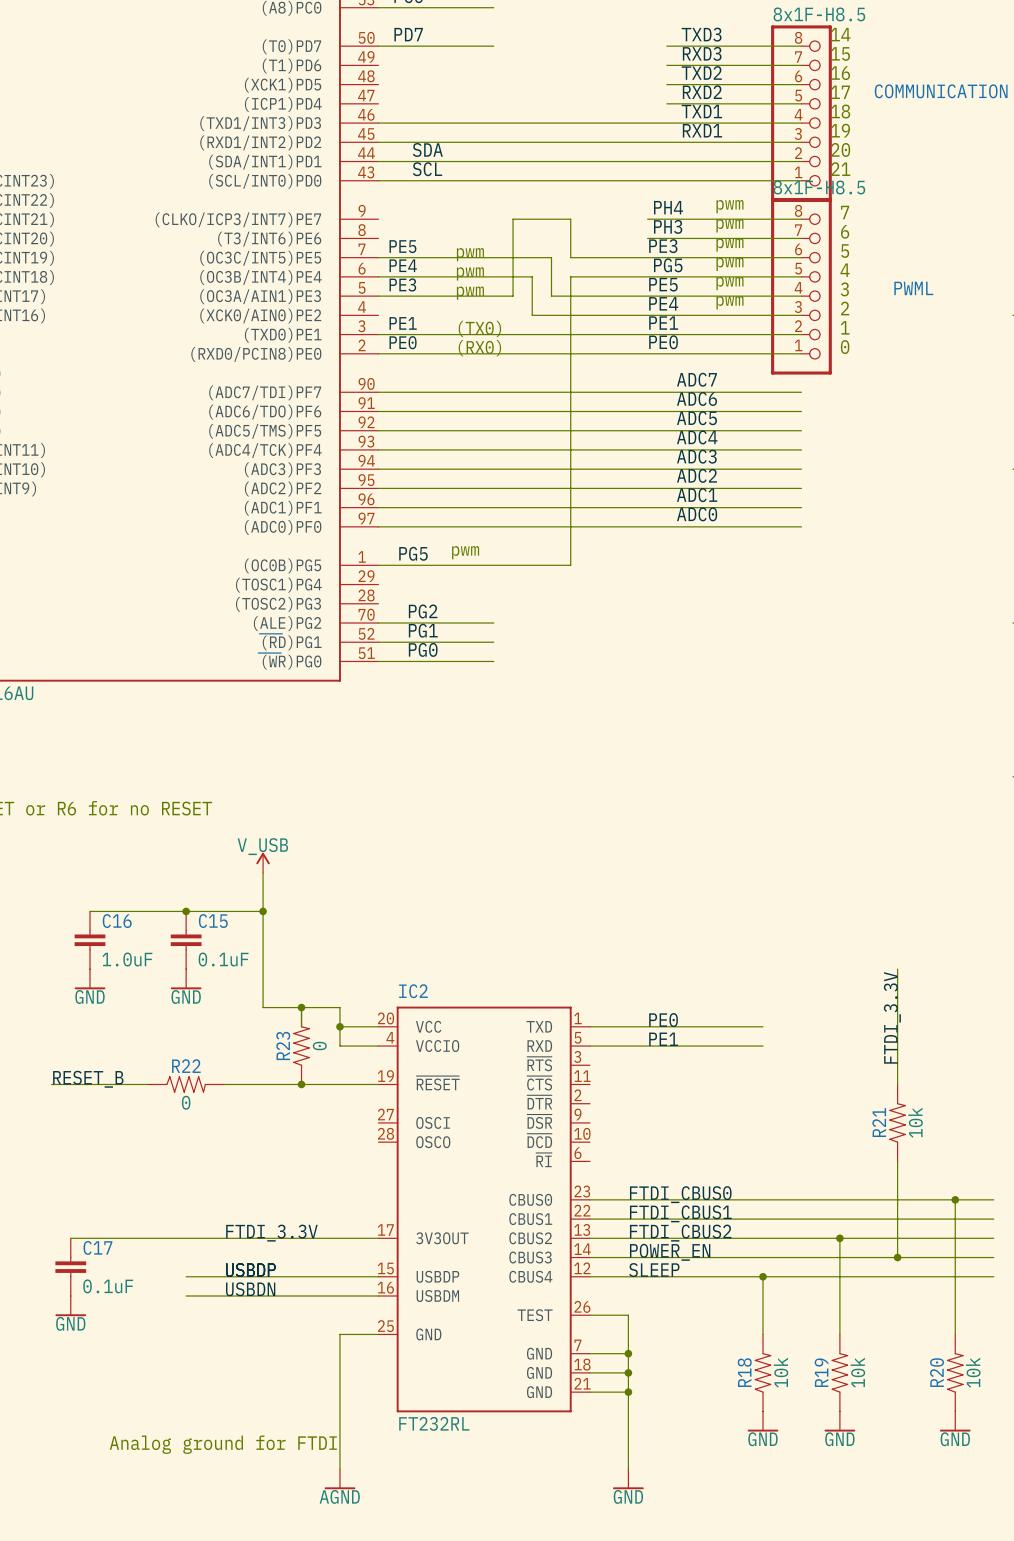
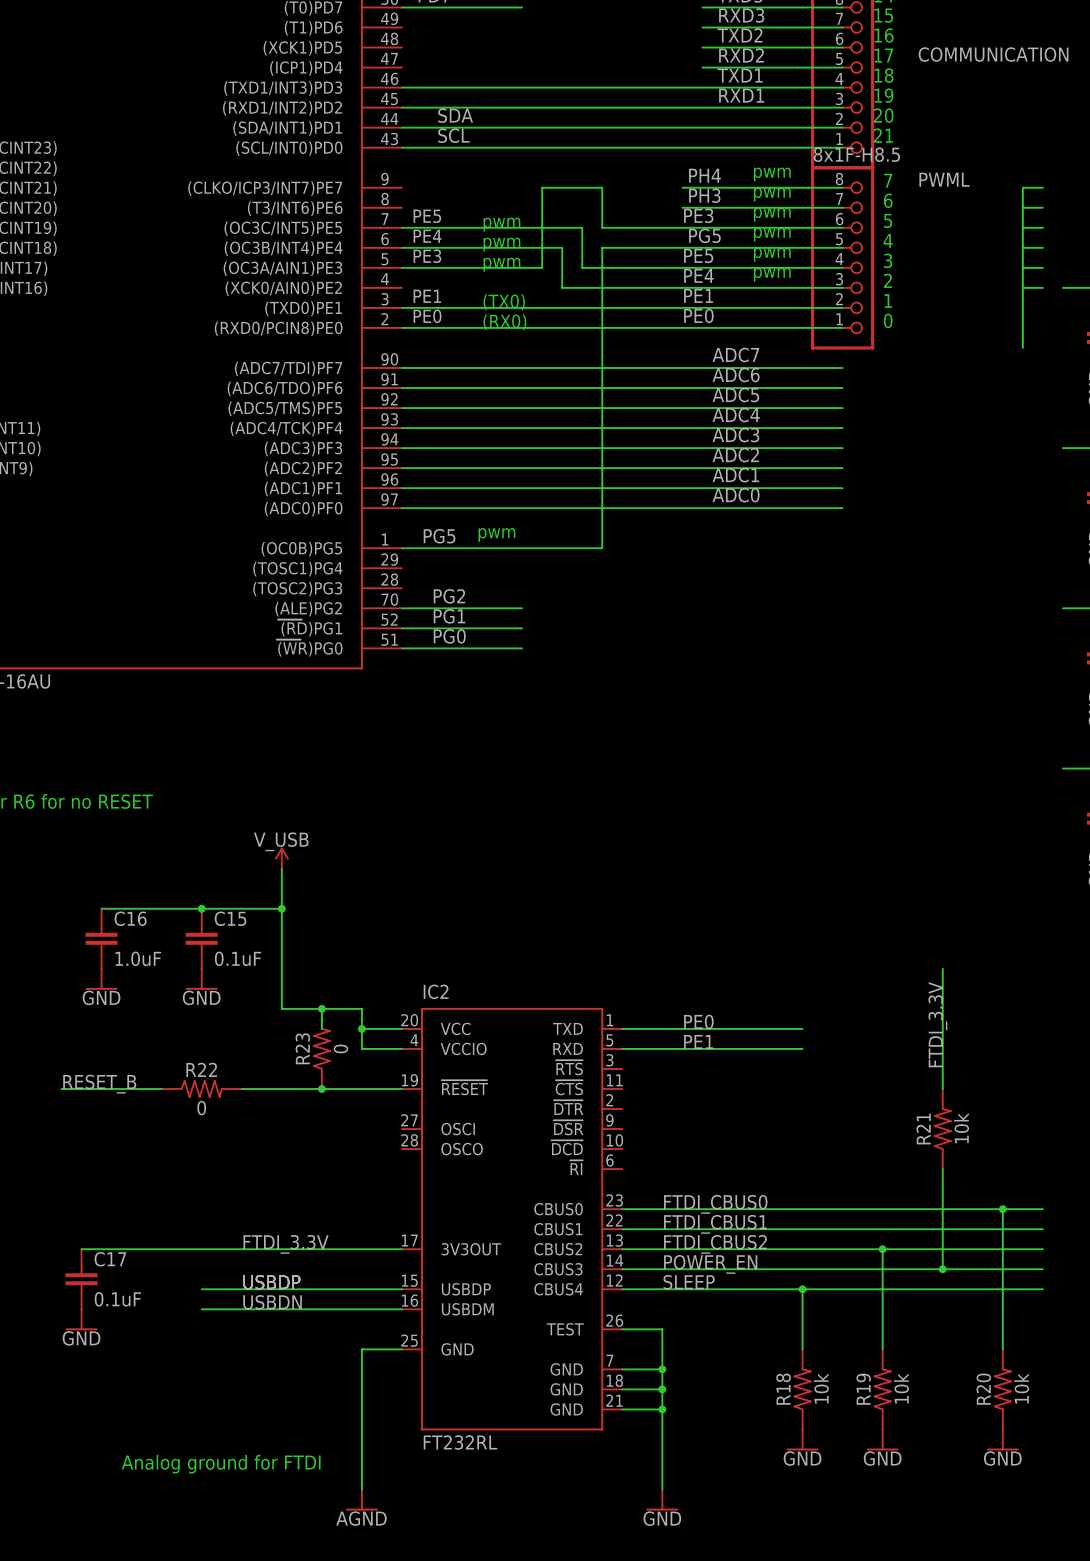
wire: none -> (1042, 187) (1022, 187) (1022, 347)
wire: none -> (1022, 207) (1042, 207)
wire: none -> (1022, 227) (1042, 227)
wire: none -> (1022, 247) (1042, 247)
PWML name position: PWML (913, 288) -> PWML (944, 179)
wire: none -> (1022, 267) (1042, 267)
wire: none -> (1022, 287) (1042, 287)

